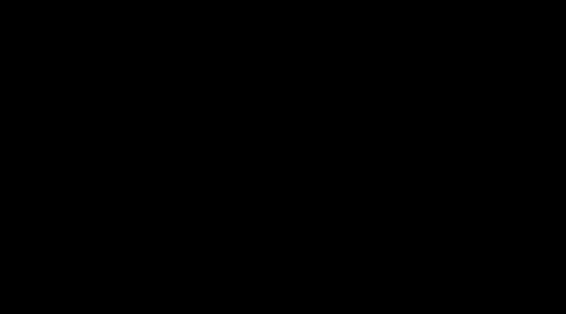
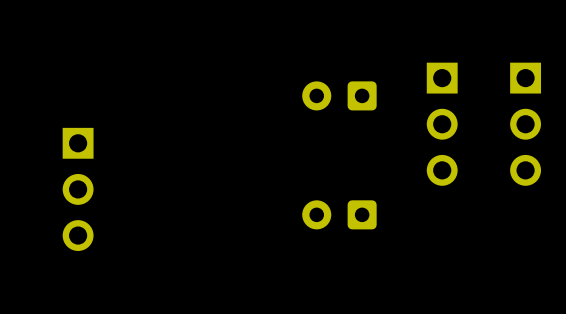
part: none -> (339, 95)
part: none -> (442, 124)
part: none -> (525, 124)
part: none -> (78, 189)
part: none -> (339, 214)

